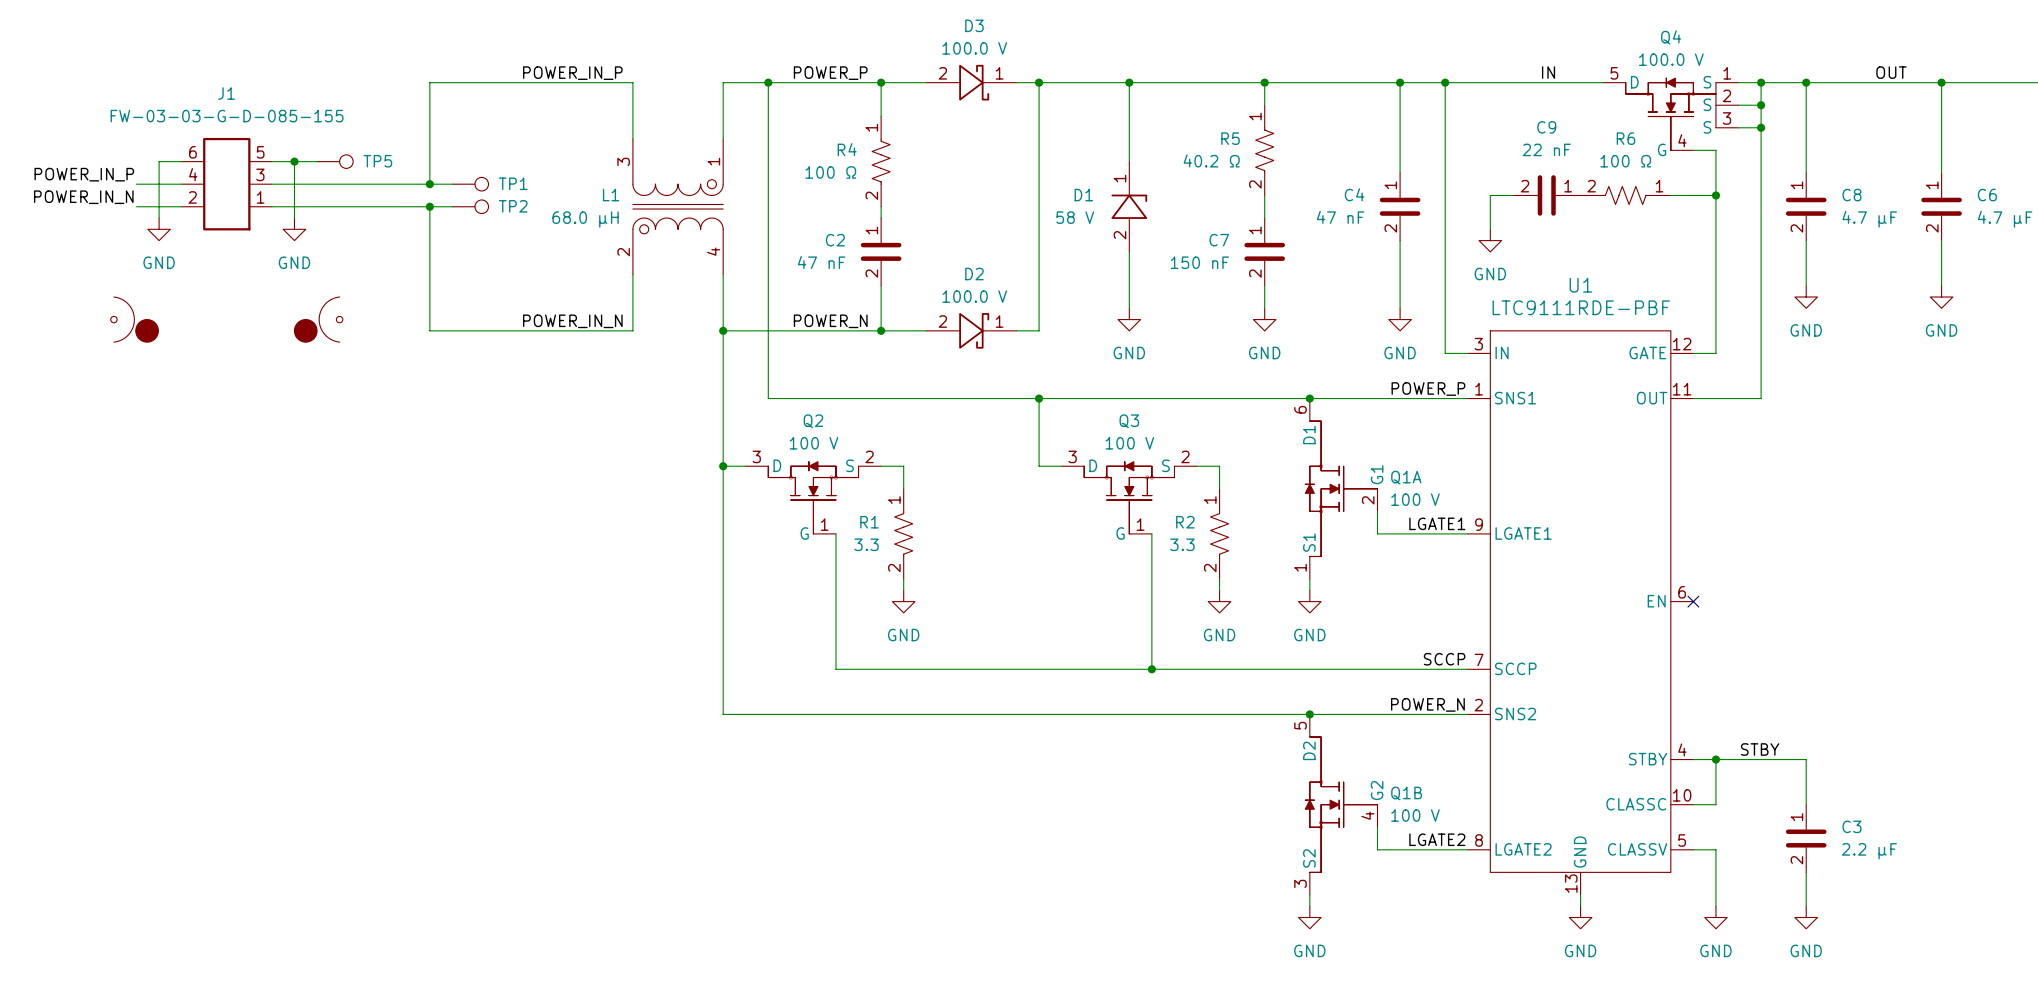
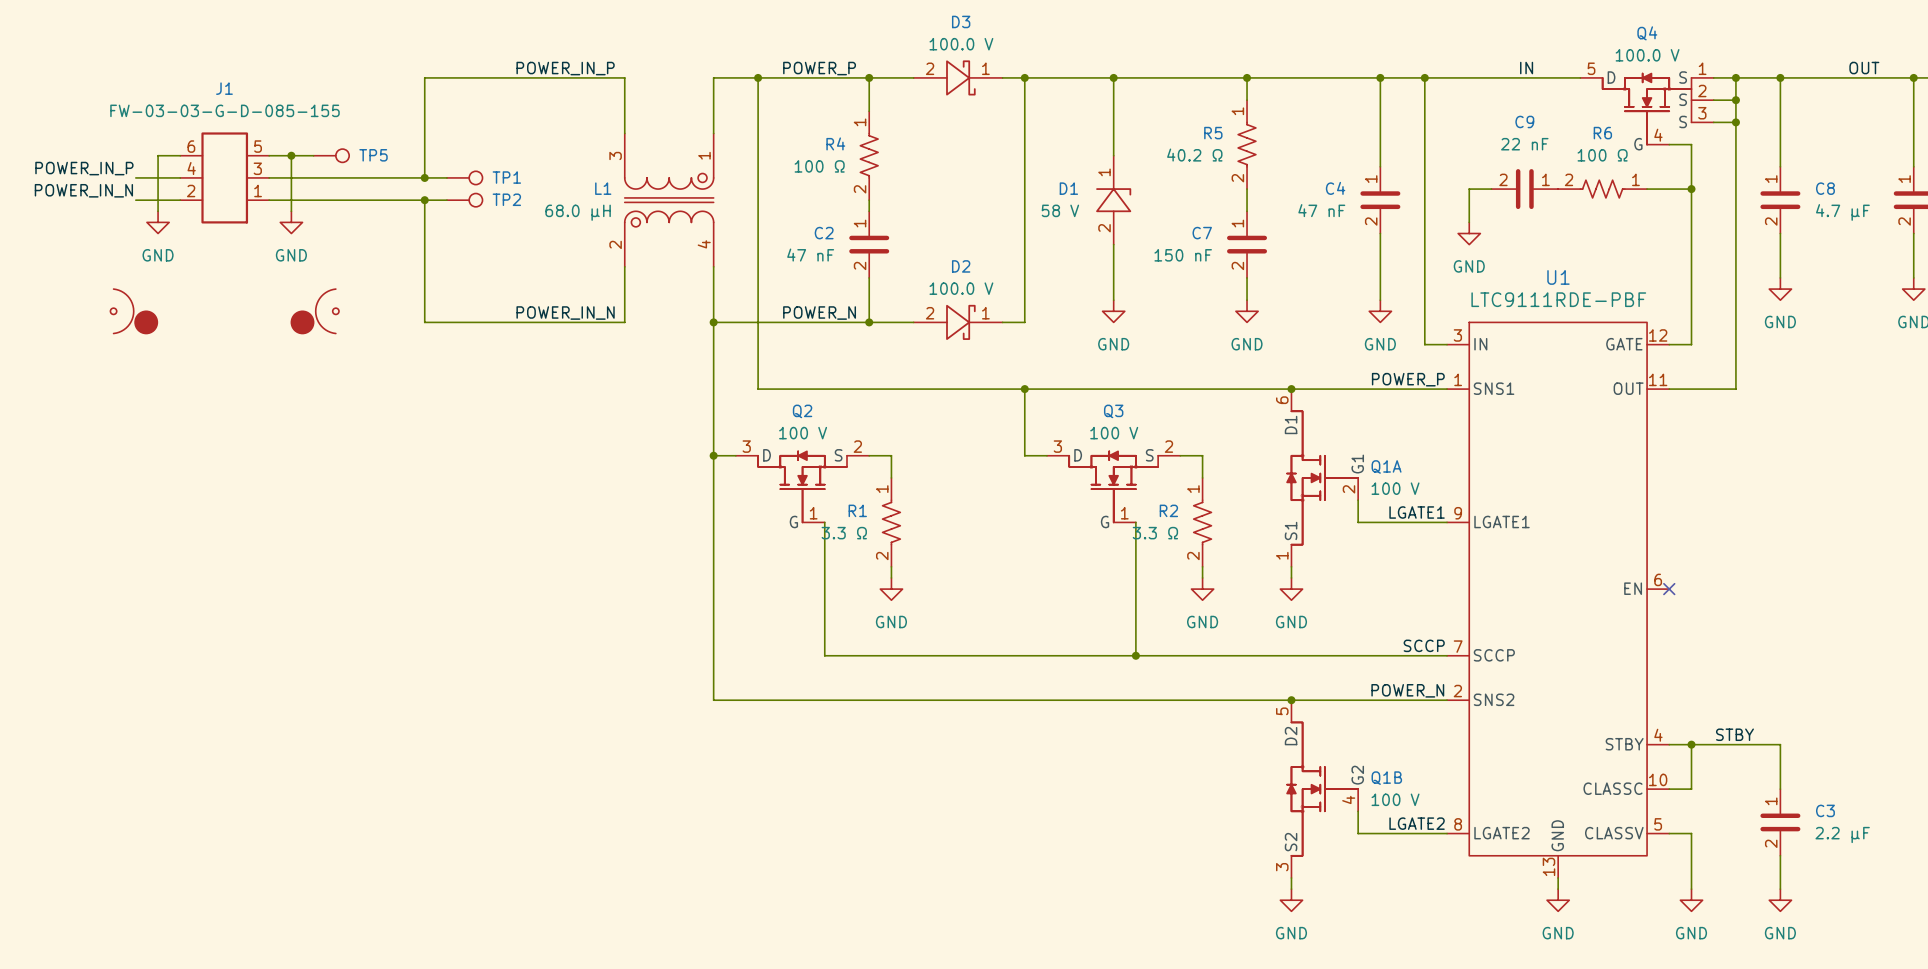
R1 value: 3.3 (866, 544) -> 3.3 Ω (844, 533)
R2 value: 3.3 (1182, 544) -> 3.3 Ω (1155, 533)

